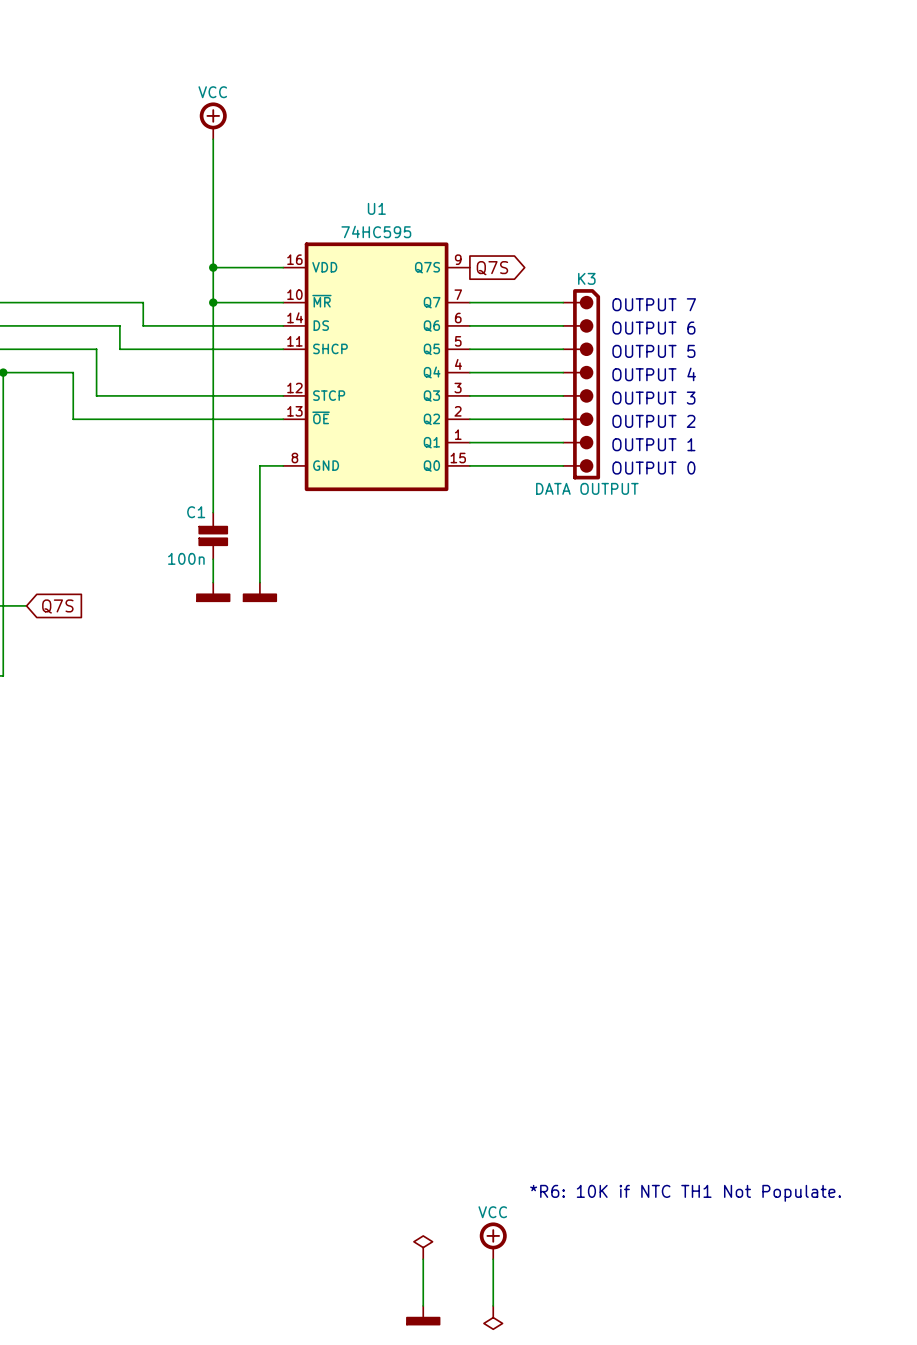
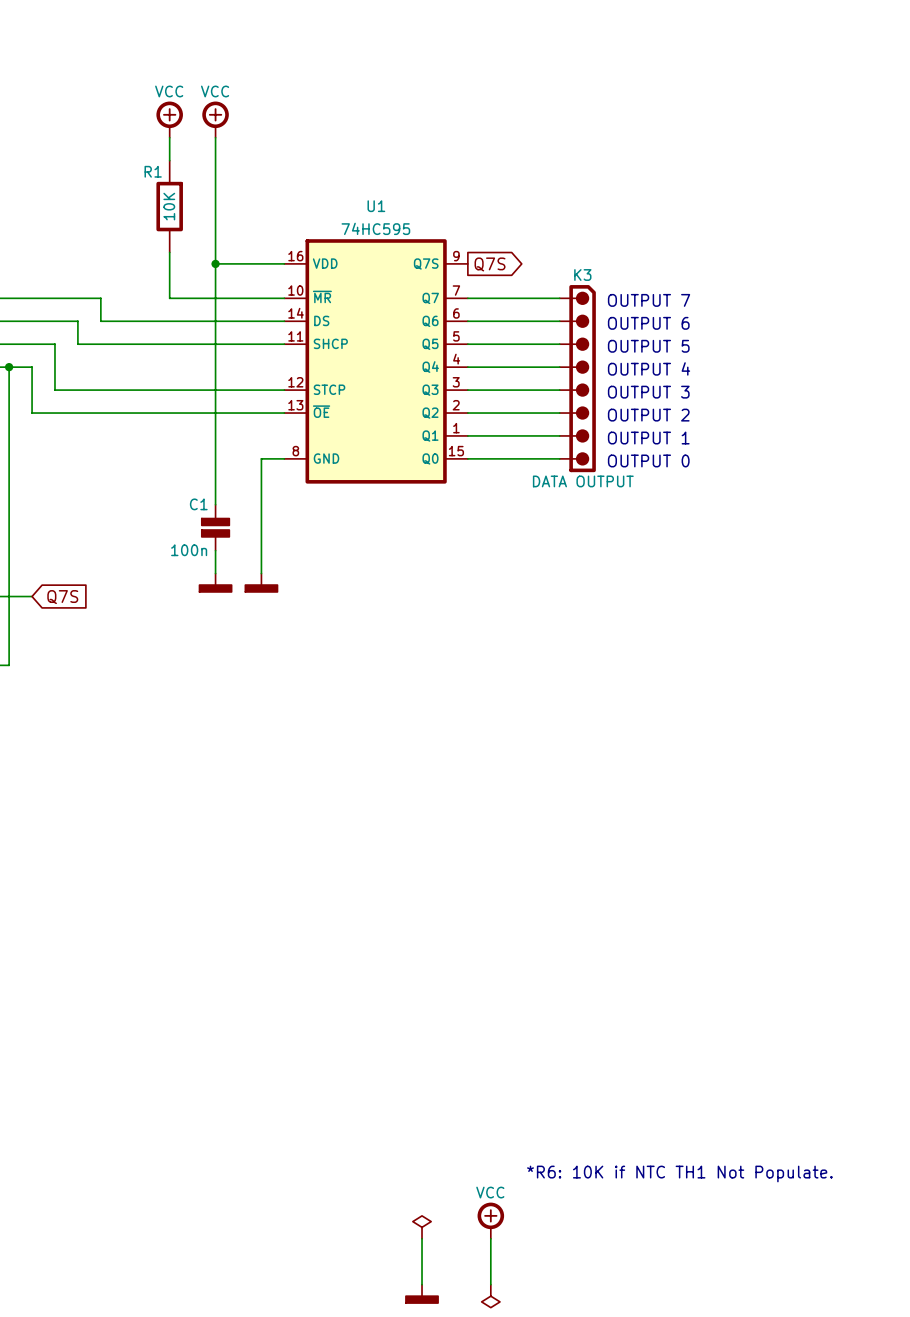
power symbol: none -> (169, 119)
wire: none -> (169, 137) (169, 160)
R1: none -> 10K (169, 206)
wire: none -> (169, 252) (169, 298) (215, 298)
wire: (96, 302) (143, 302) (143, 325) -> (123, 321) (146, 321)
junction: (213, 302) -> none
wire: (73, 325) (96, 325) -> (100, 298) (100, 321)
wire: (119, 325) (119, 349) -> (100, 344) (123, 344)
wire: (49, 349) (73, 349) -> (77, 321) (77, 344)
wire: (96, 349) (96, 395) -> (54, 344) (54, 390) (100, 390)
wire: (26, 372) (73, 372) (73, 419) -> (32, 367) (32, 413) (77, 413)

